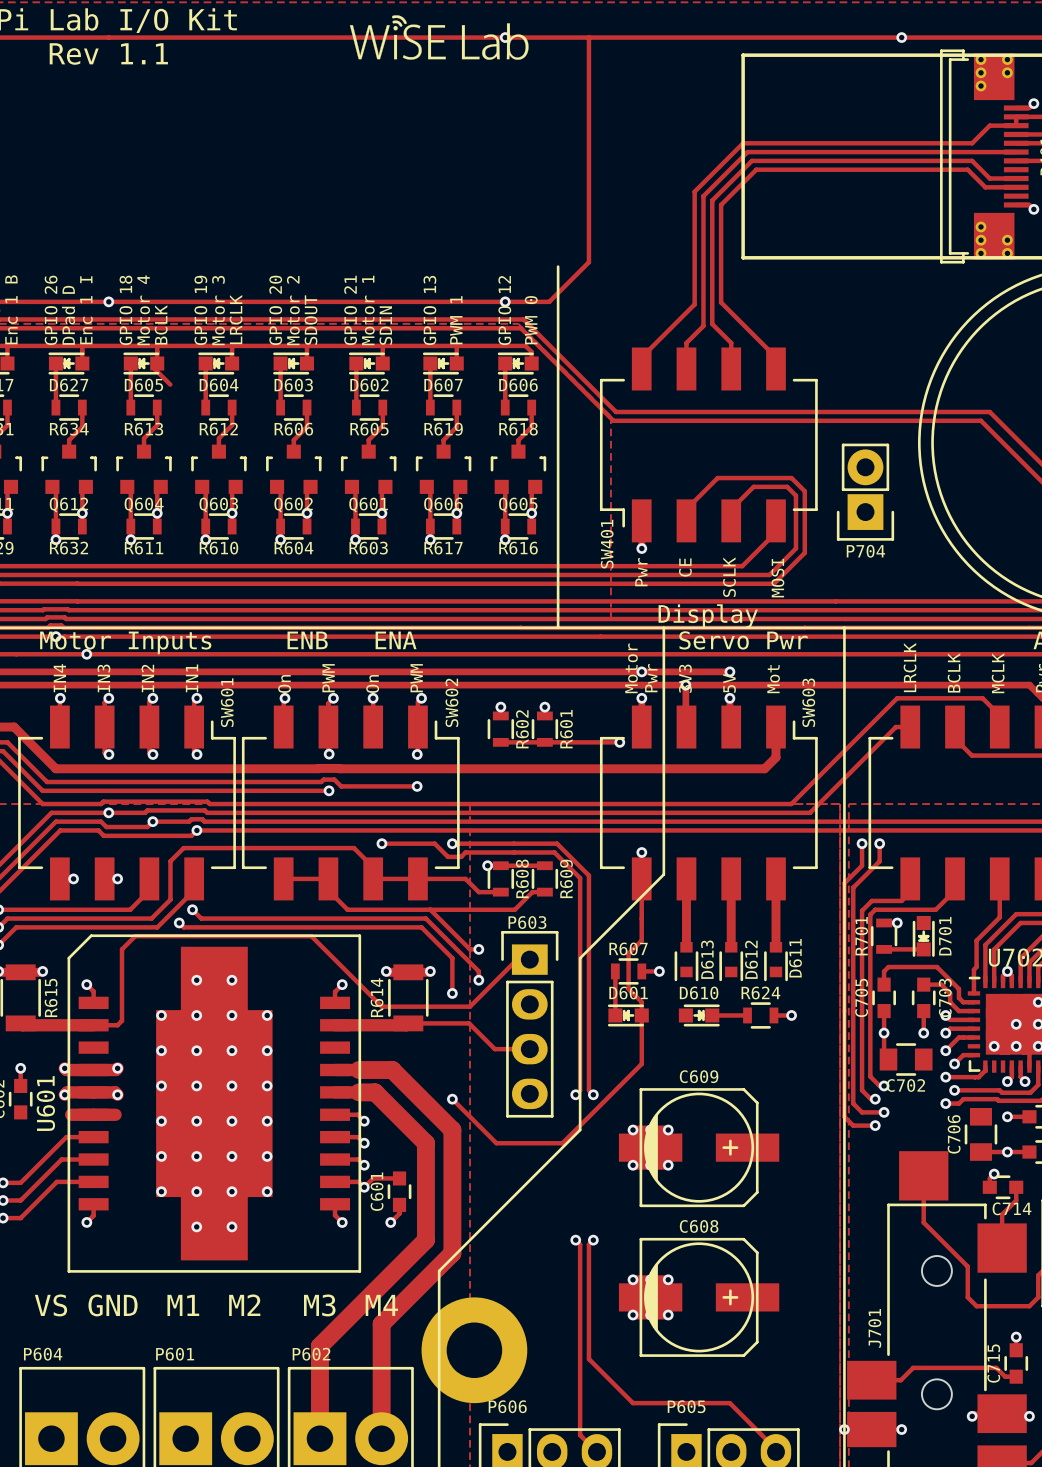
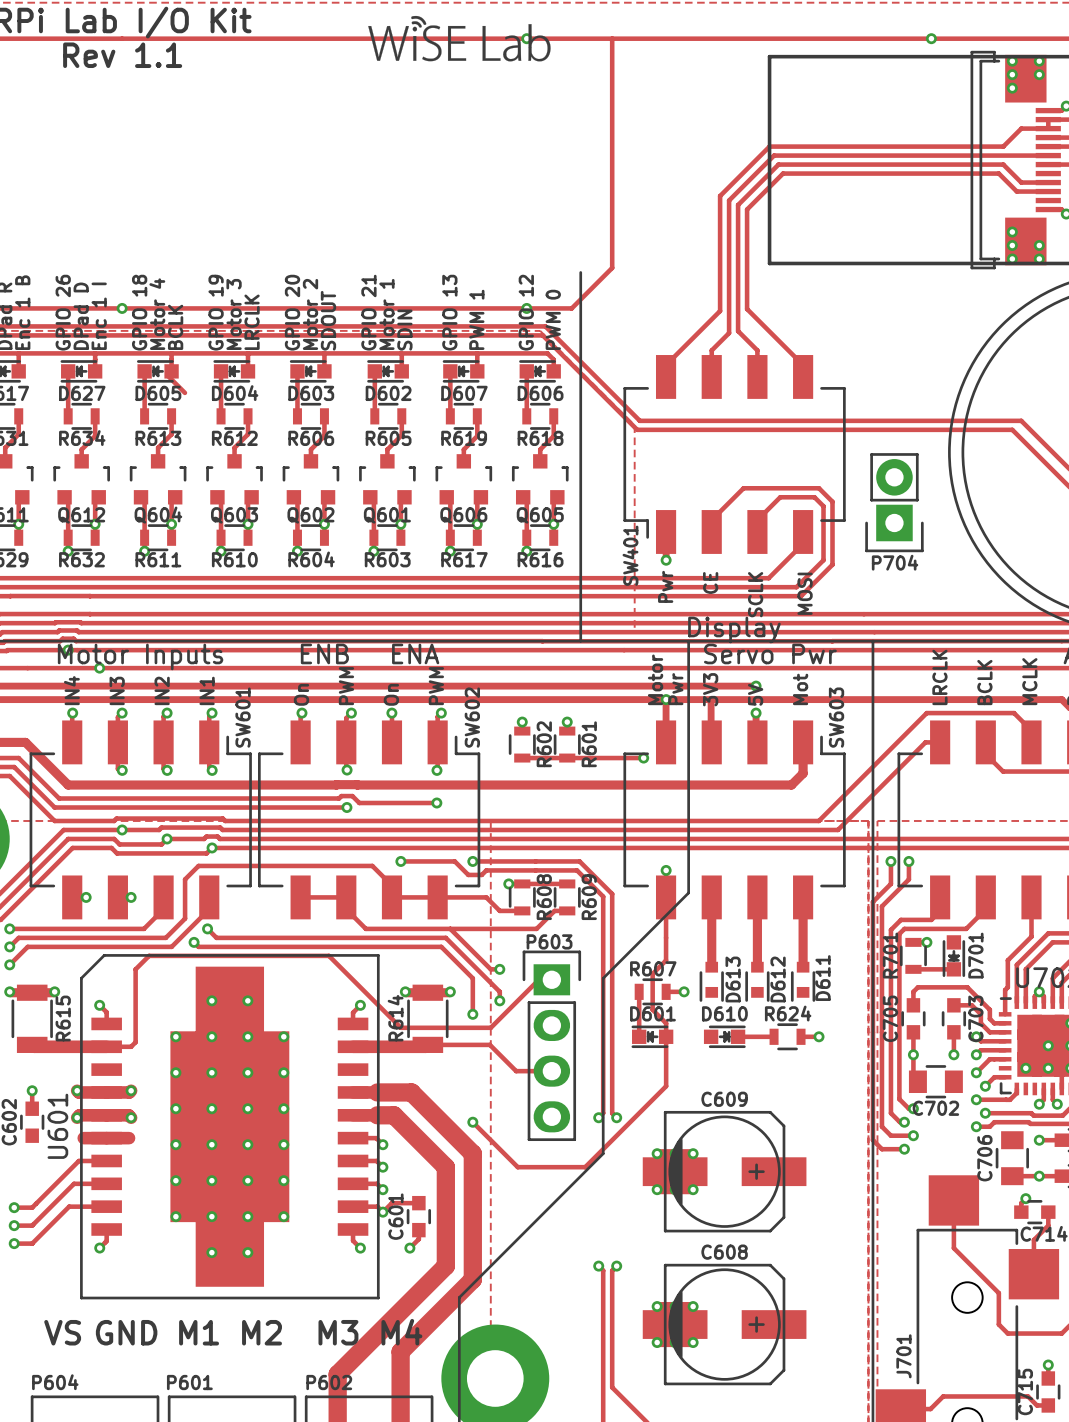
via: (641, 671) -> none
via: none -> (666, 699)
via: (685, 685) -> none
via: (641, 698) -> none

